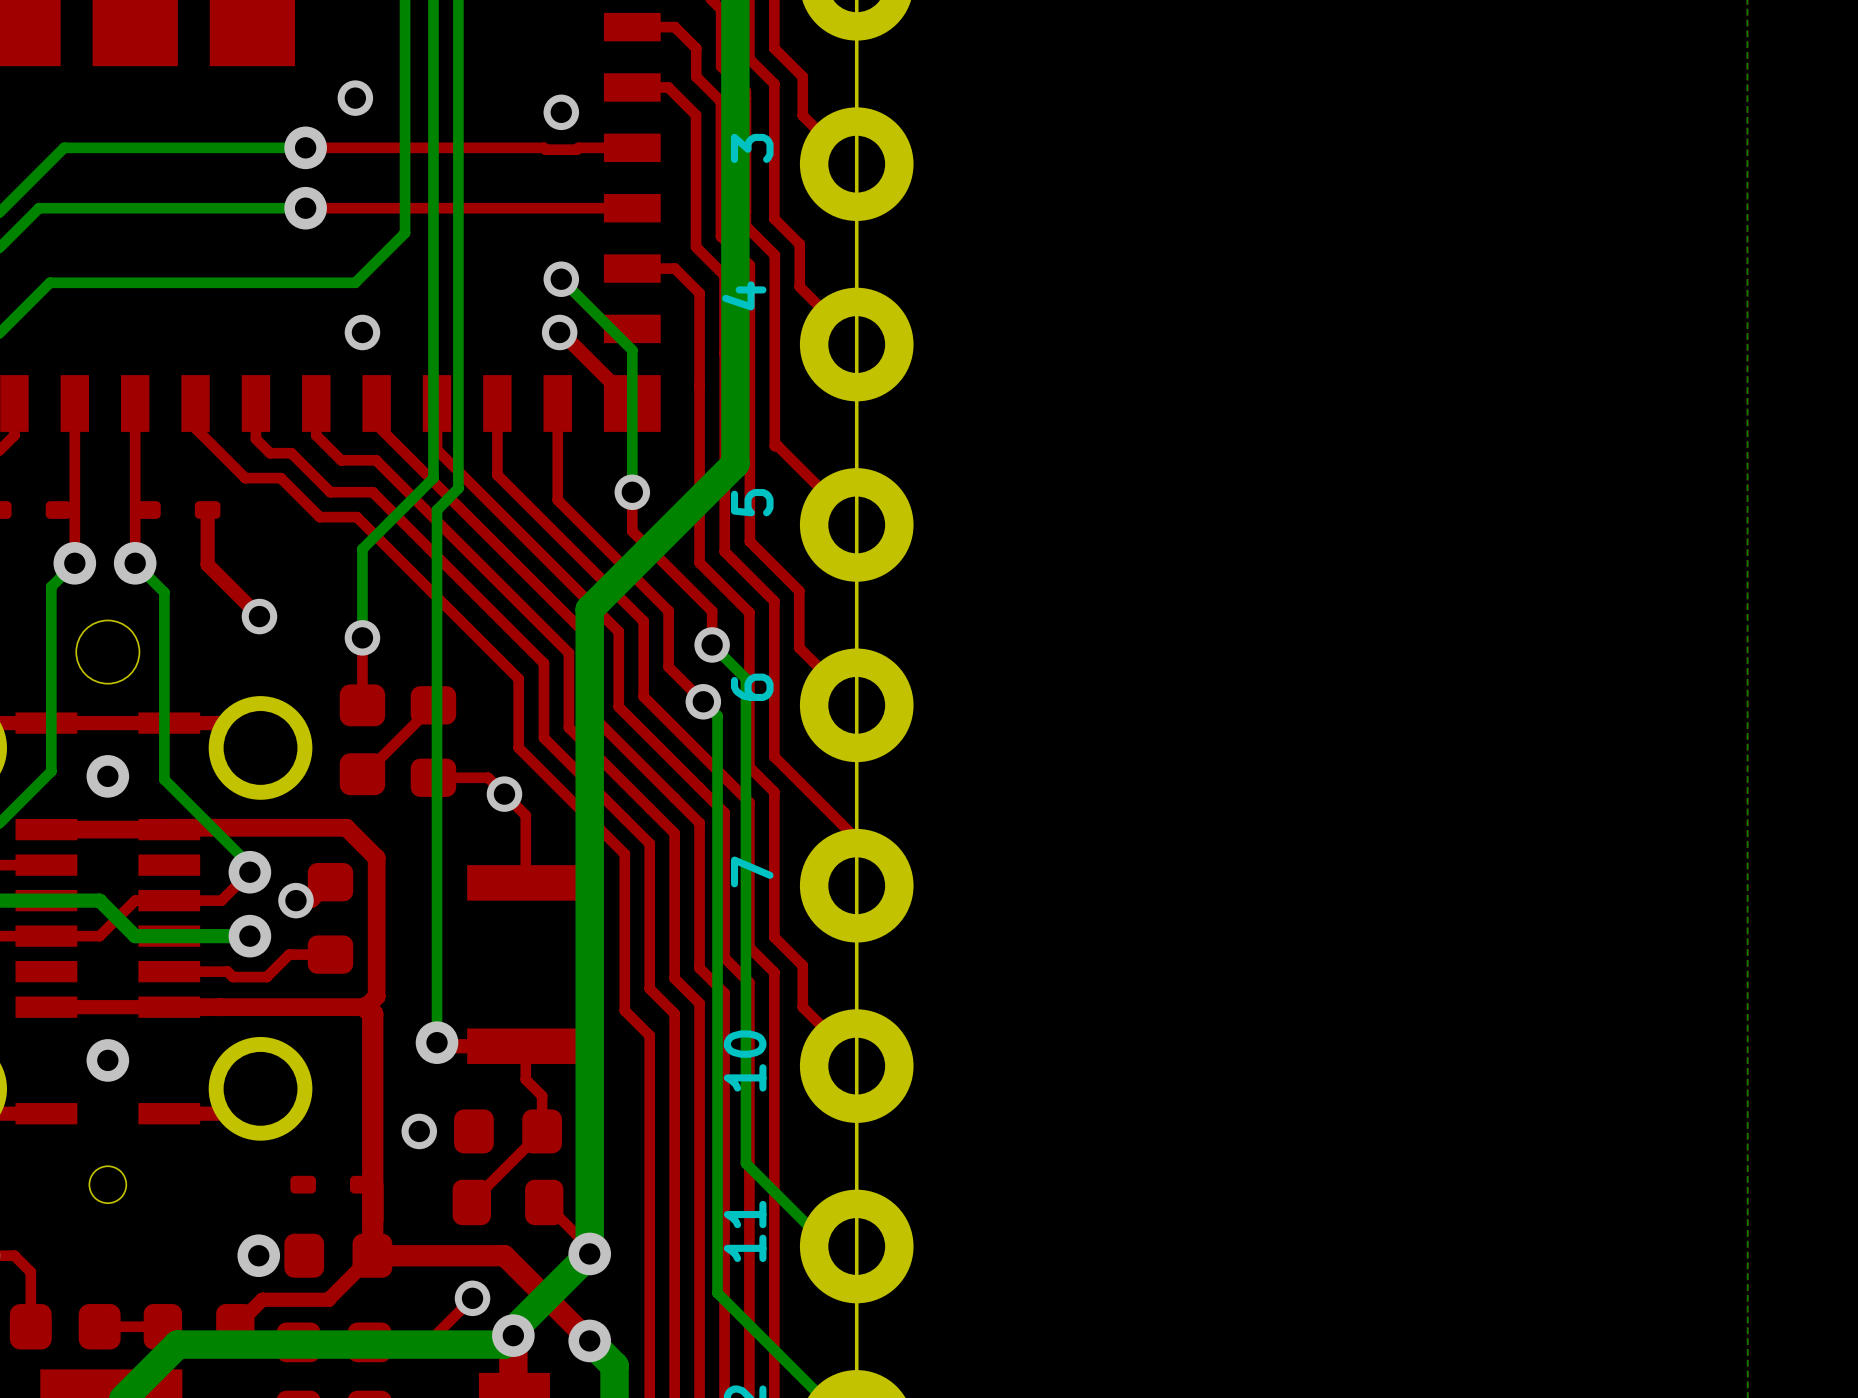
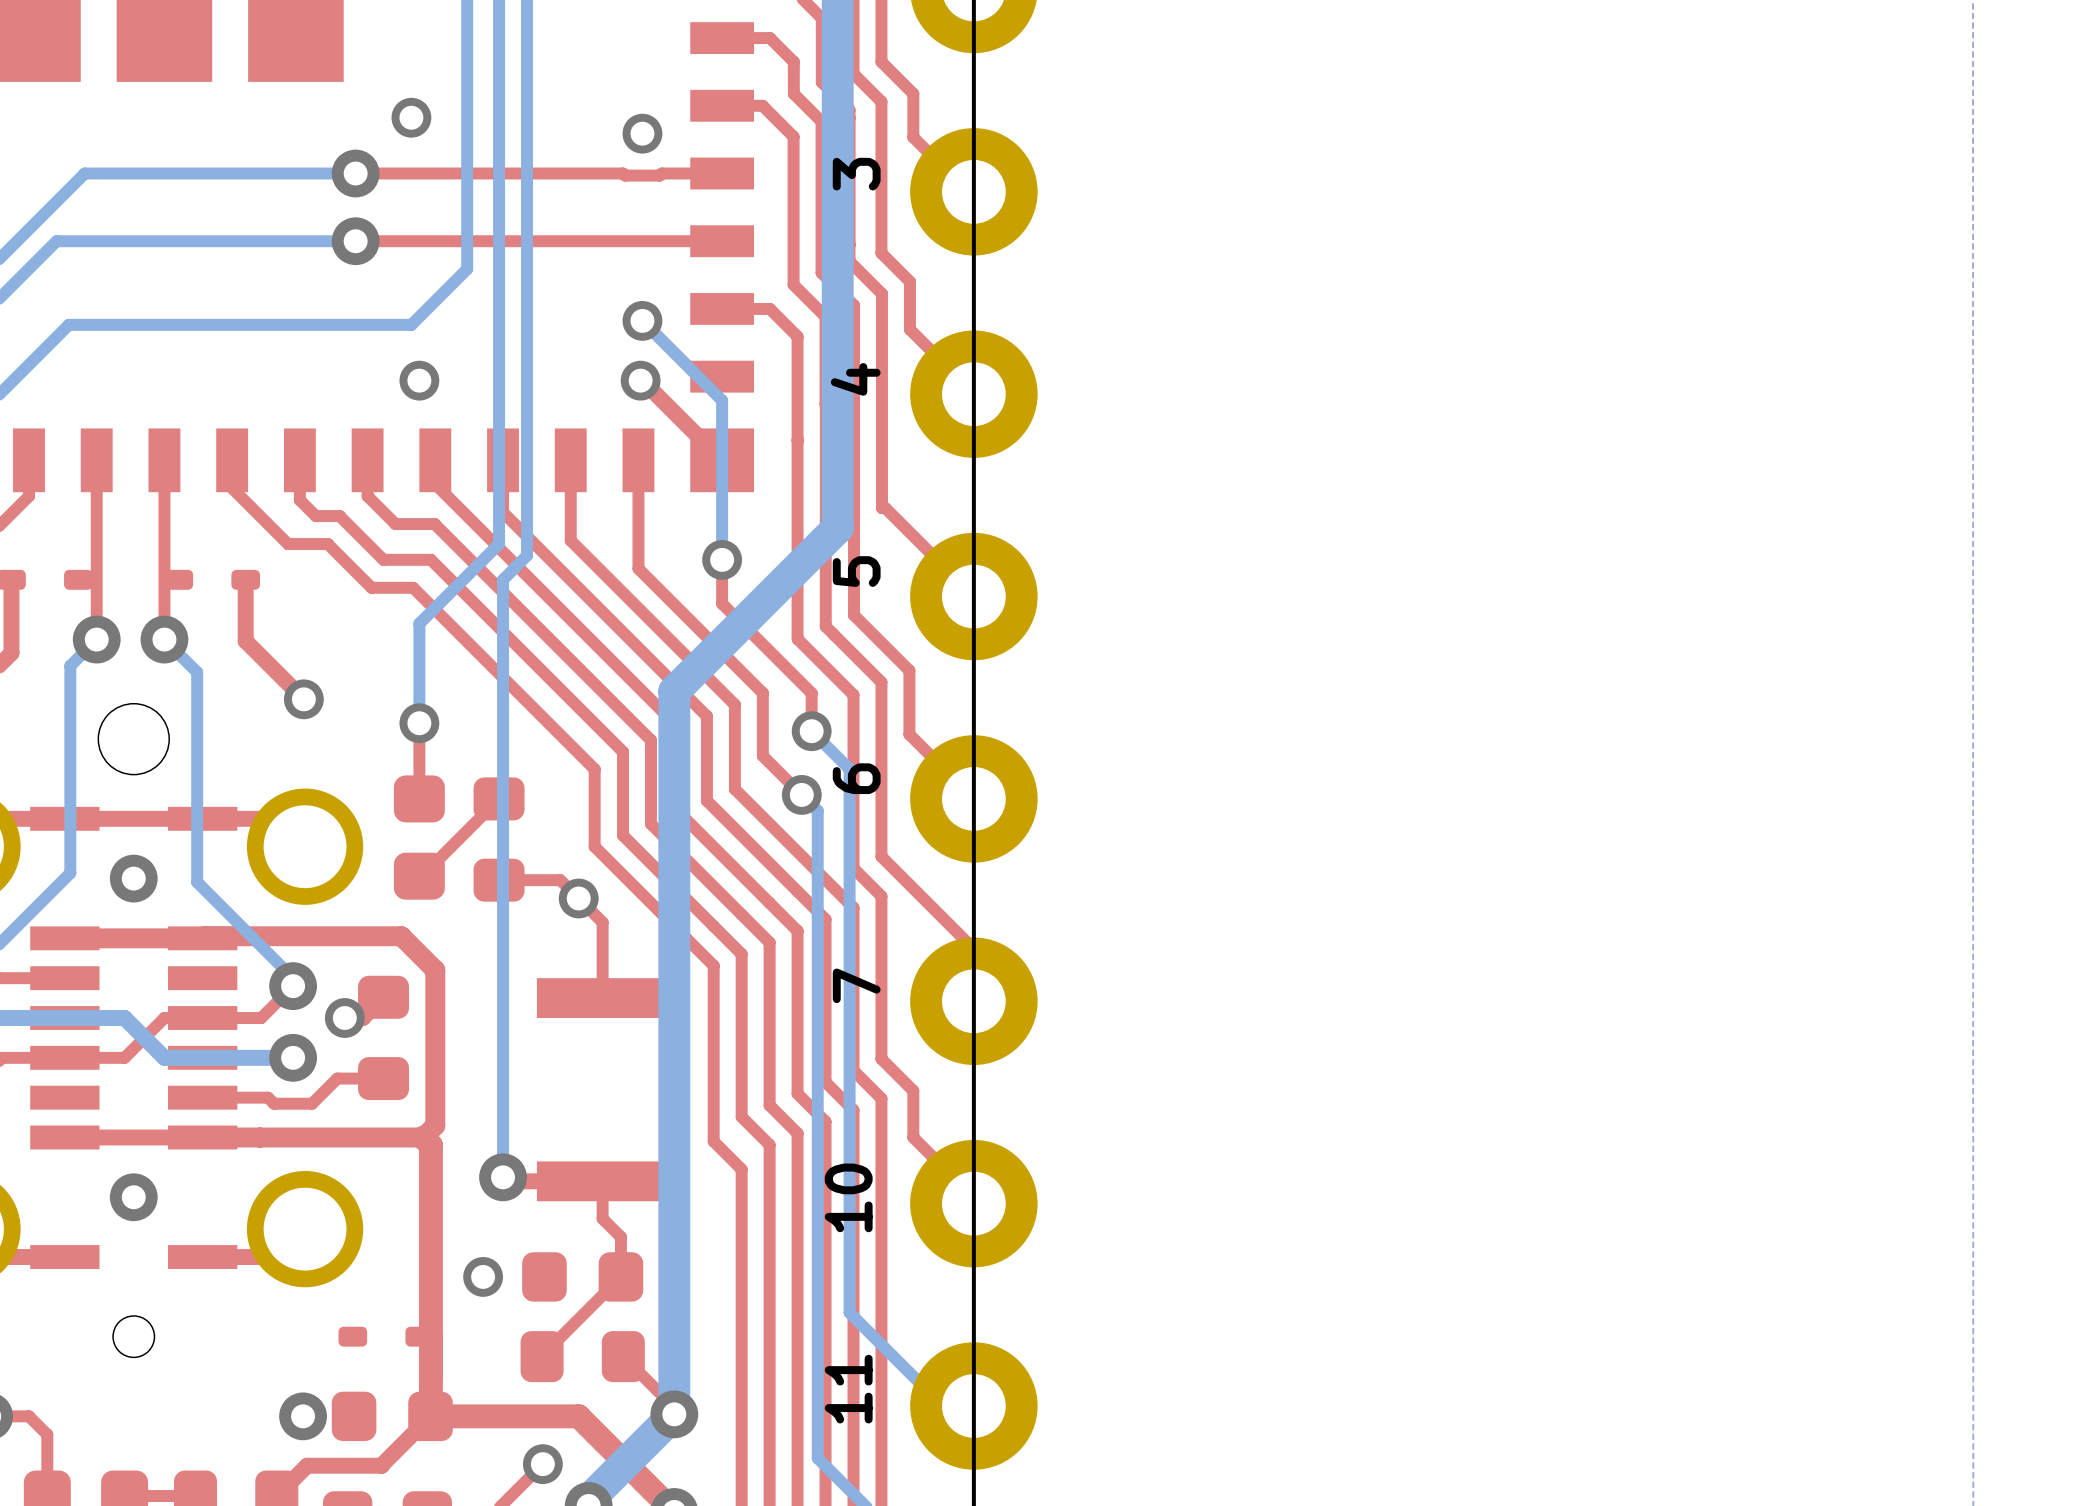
text position: 4 (744, 295) -> 4 (855, 379)

